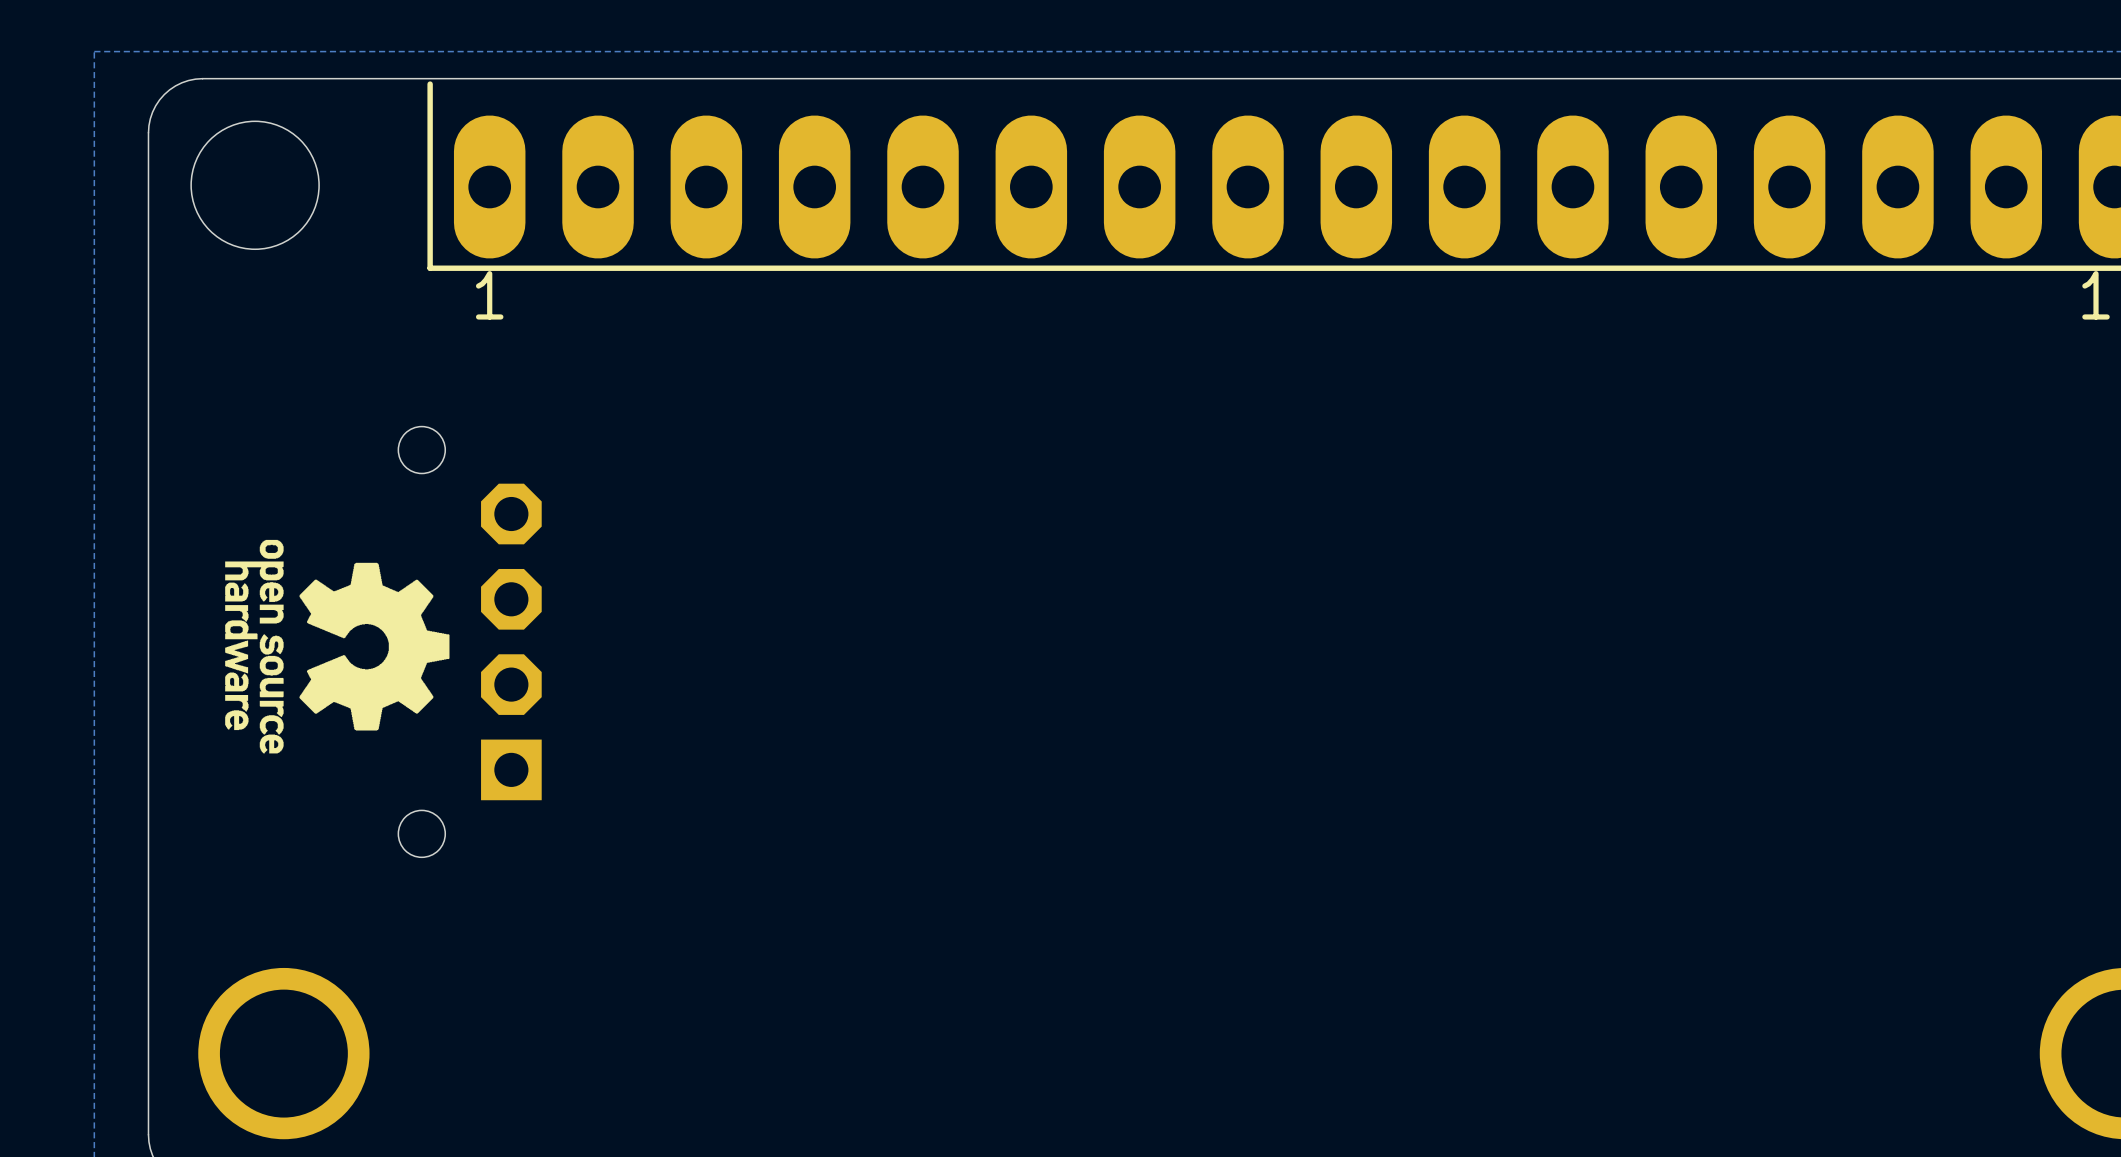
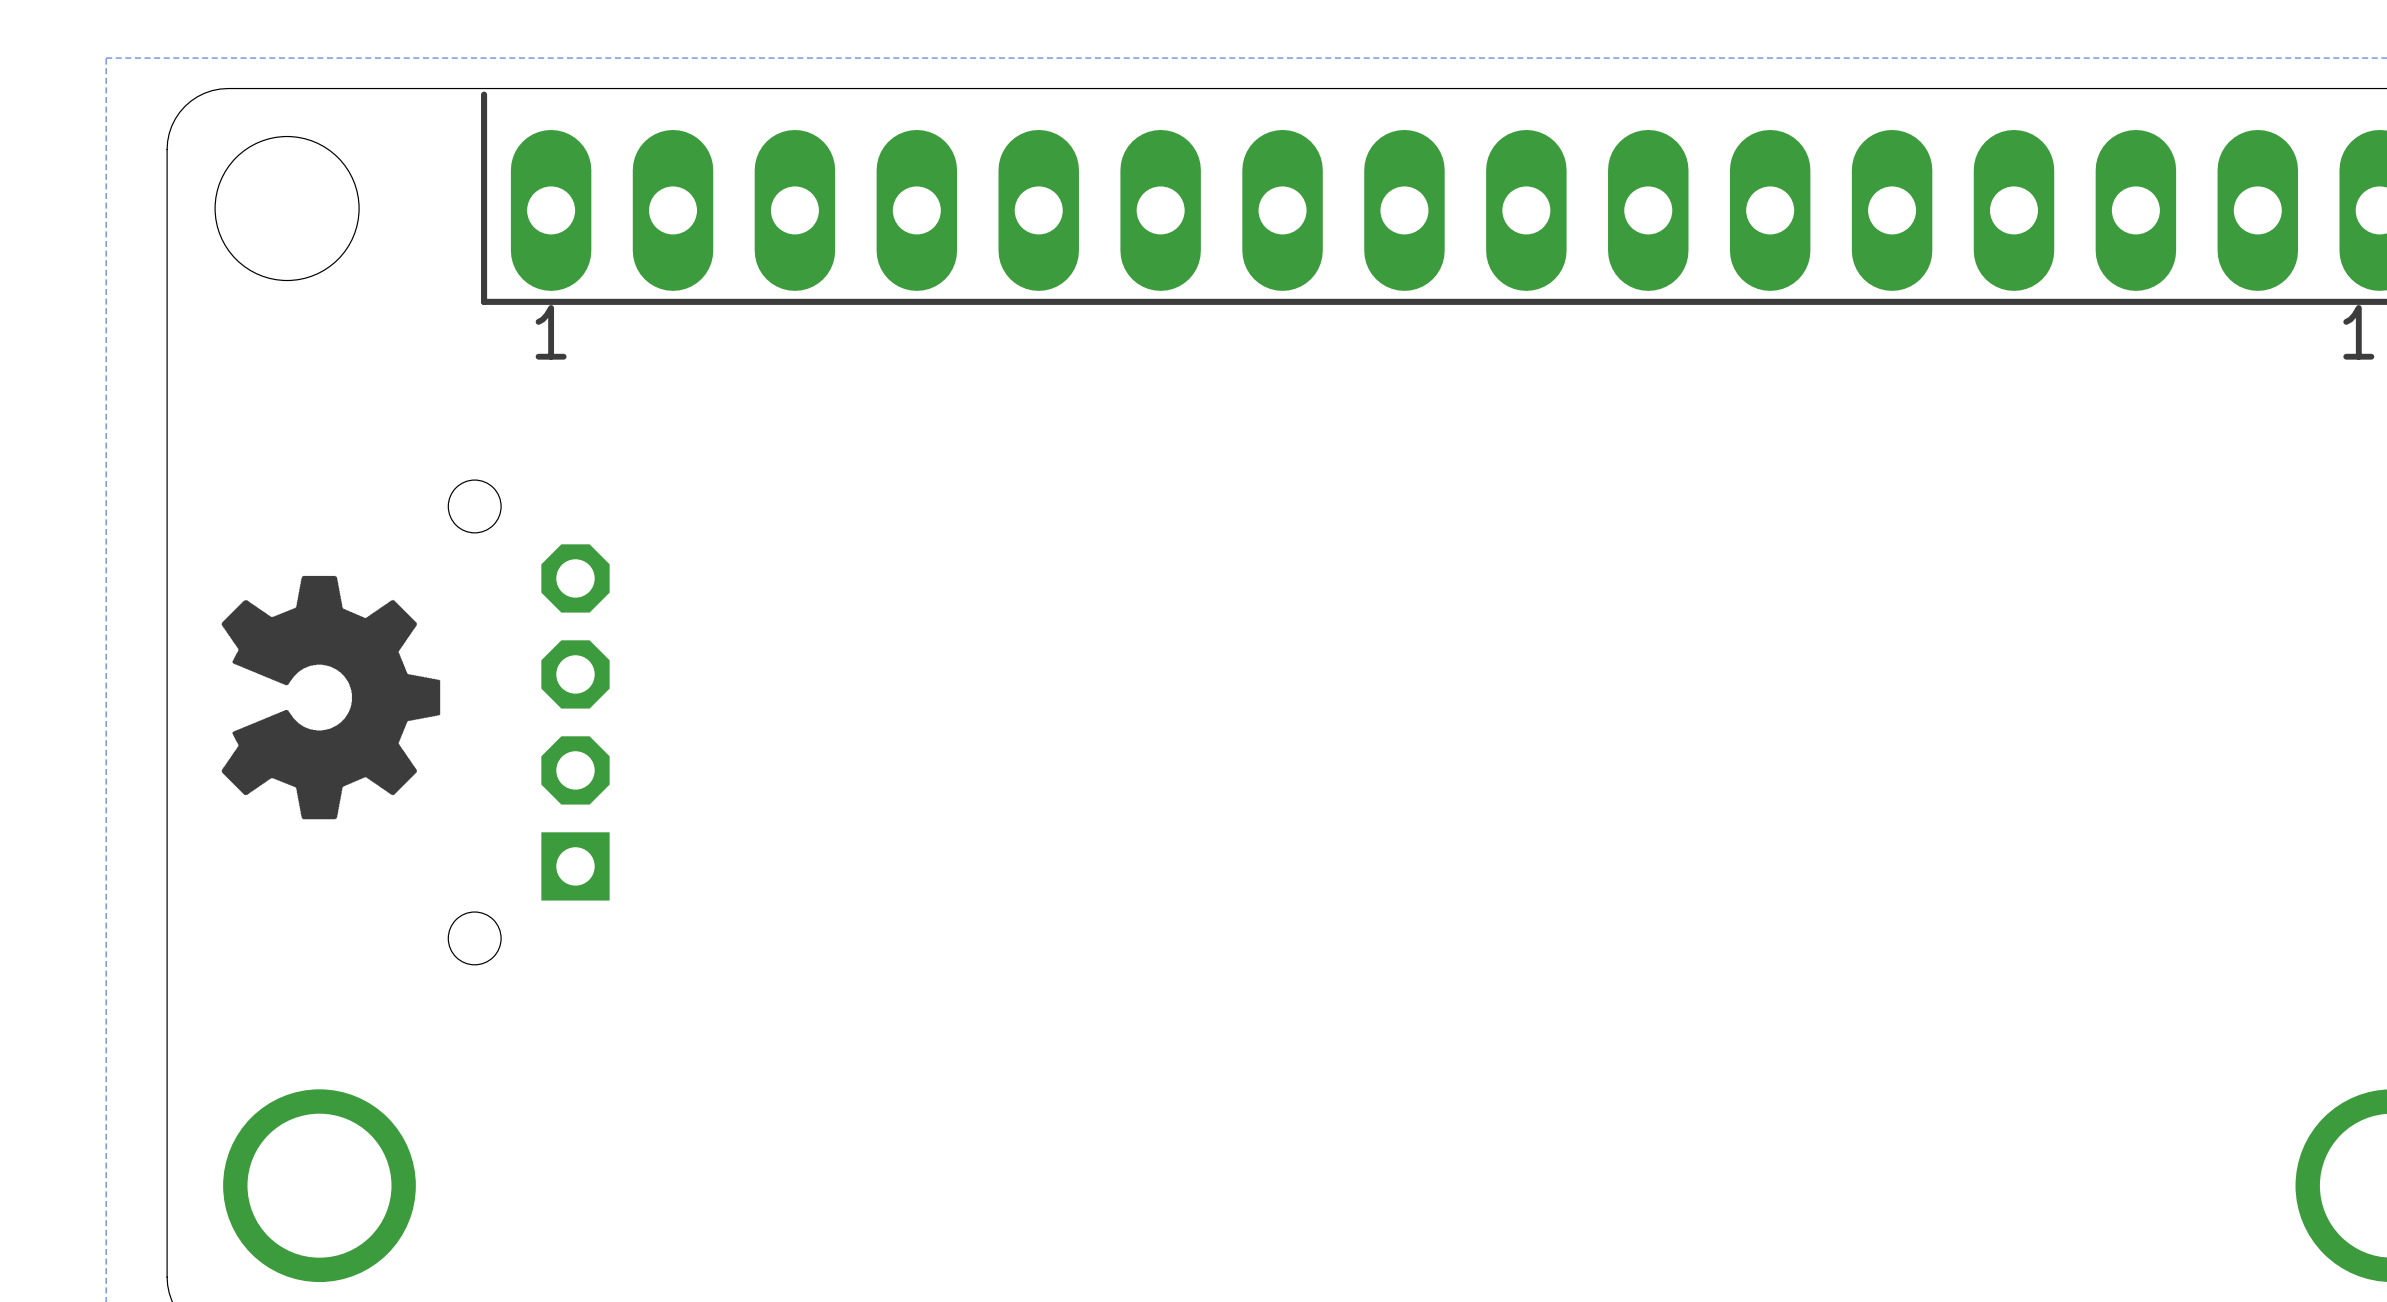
drawing: none -> [221, 575, 441, 820]
drawing: [225, 539, 450, 754] -> none

